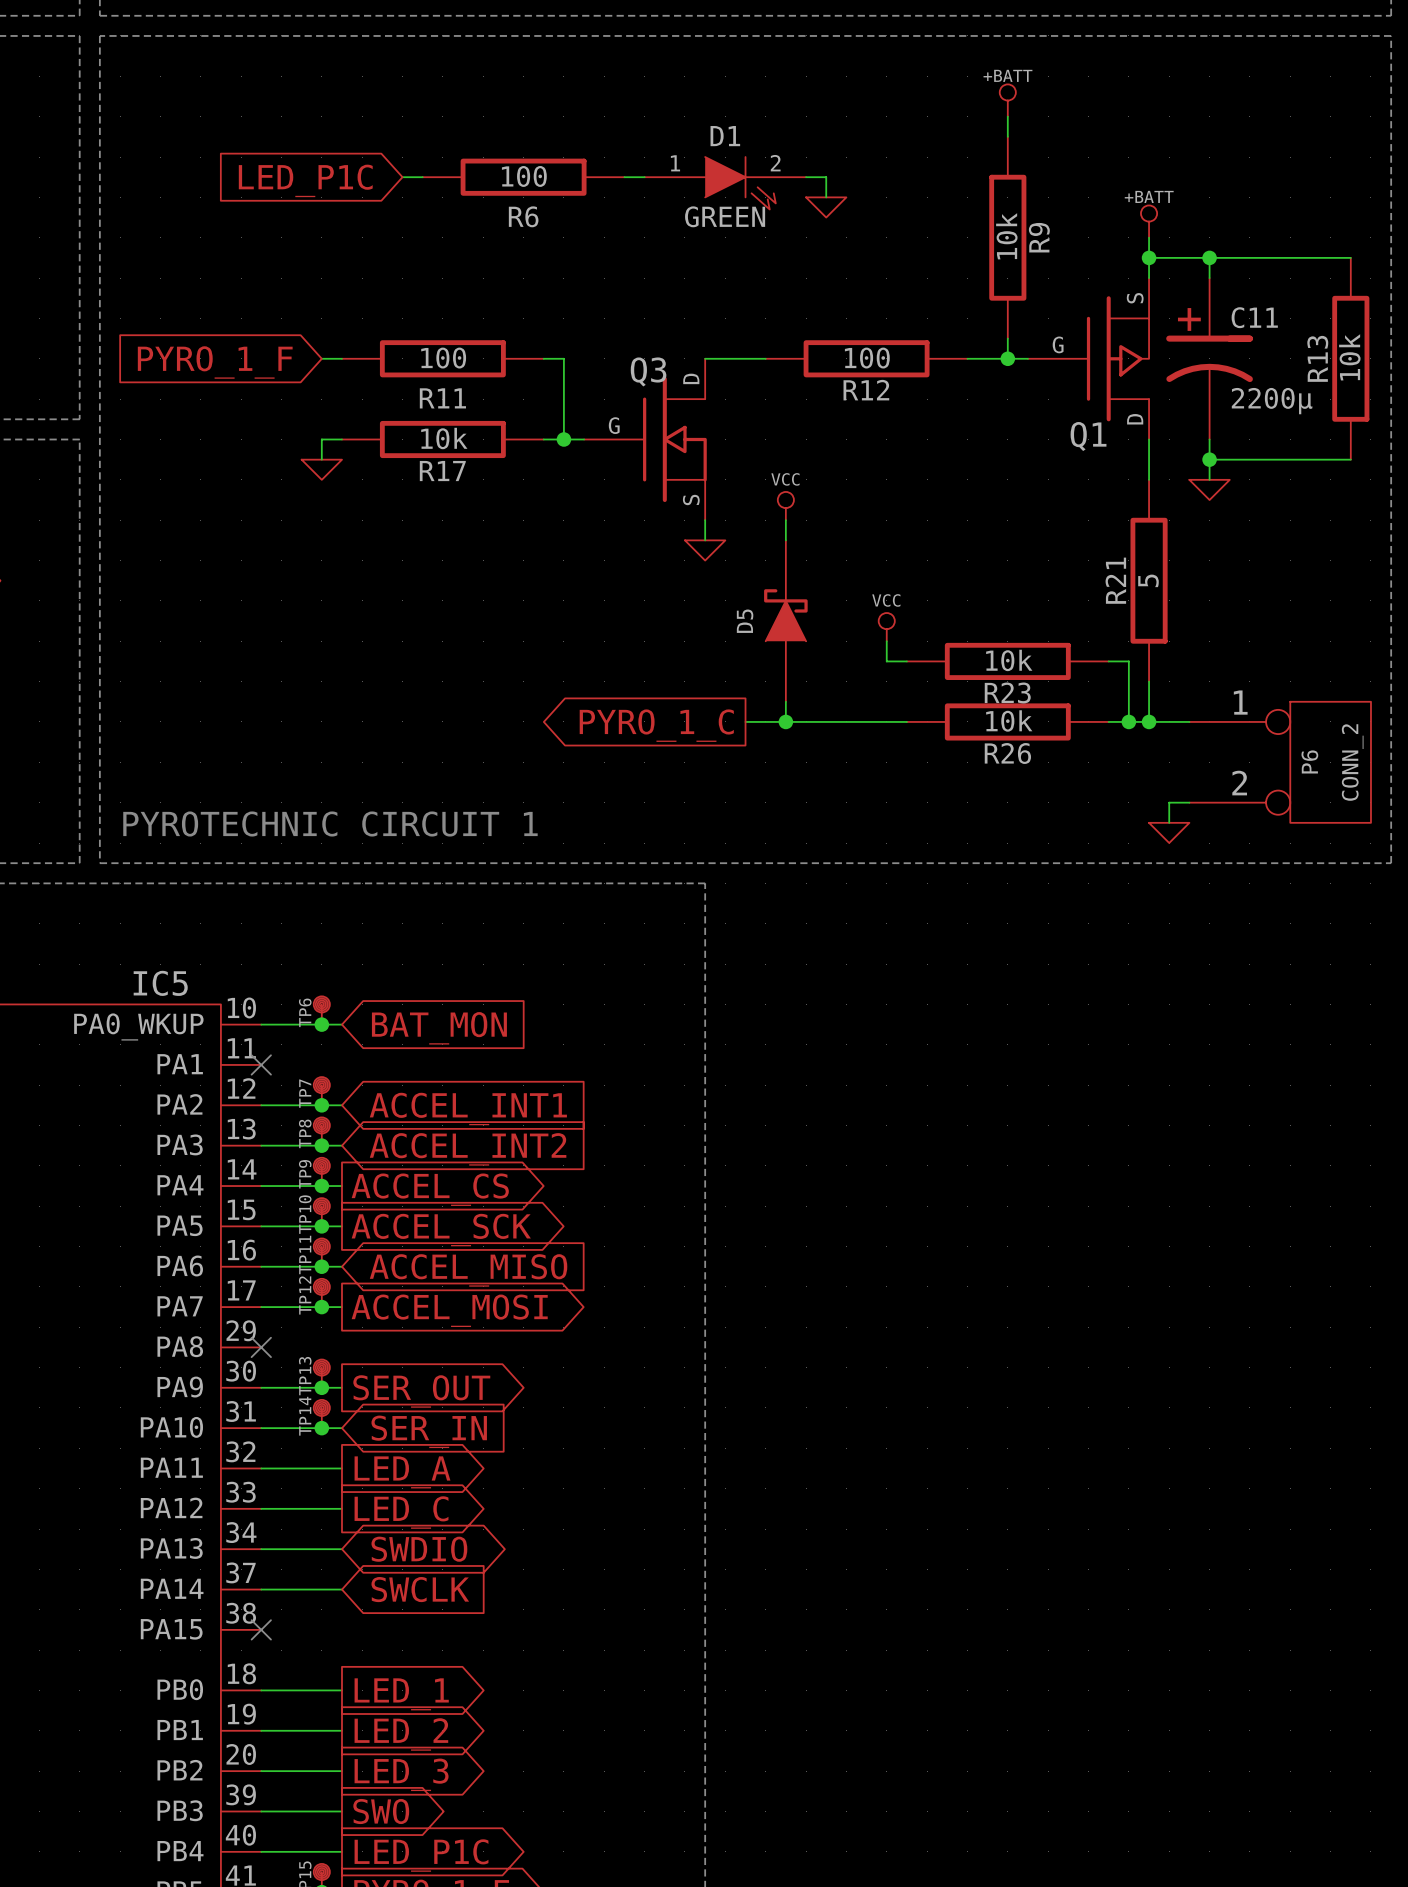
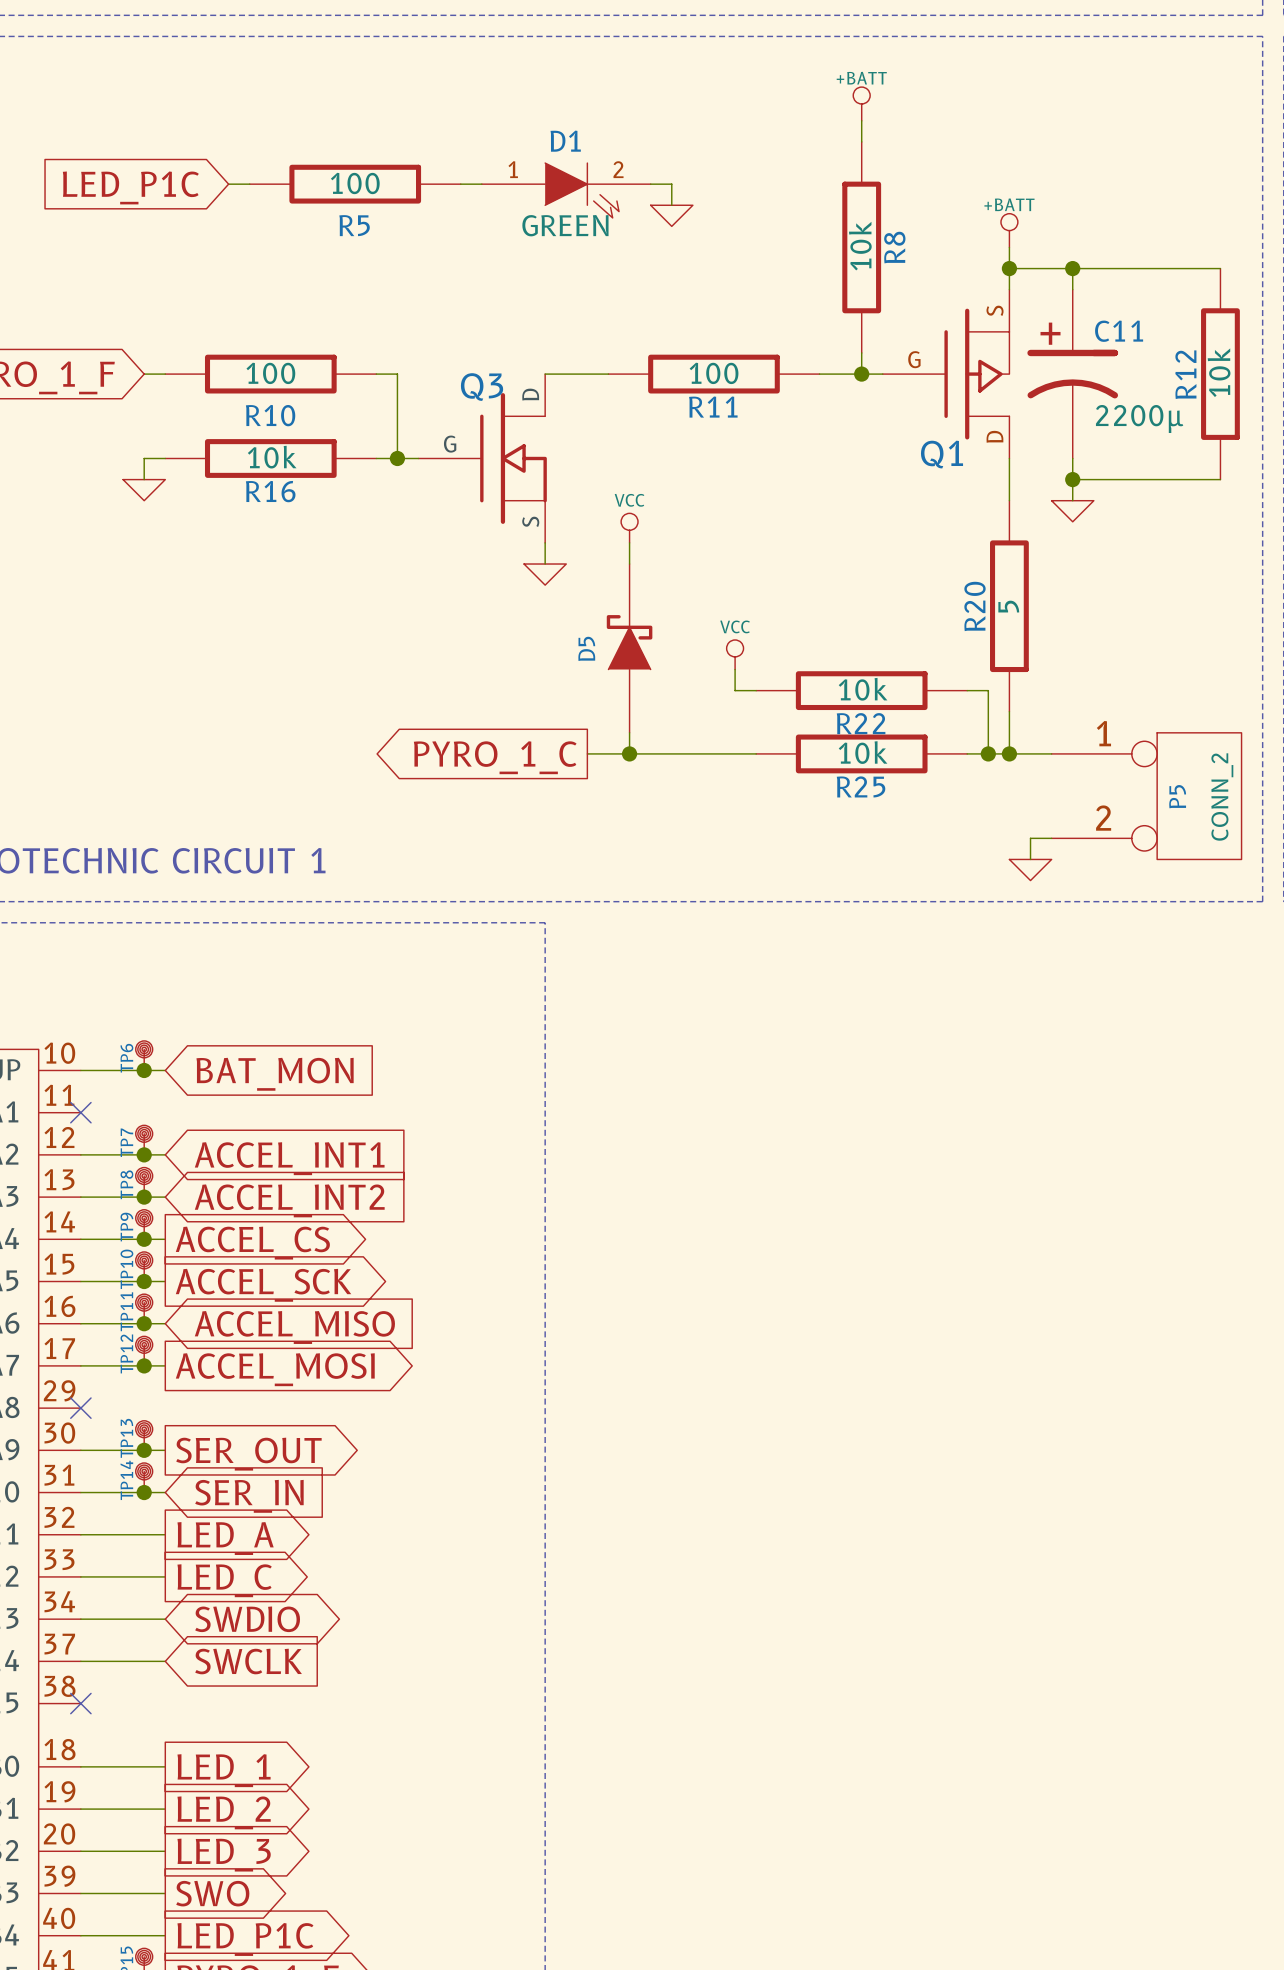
R6 name: R6 (523, 216) -> R5 (354, 225)
R9 name: R9 (1039, 237) -> R8 (894, 247)
R13 name: R13 (1317, 358) -> R12 (1185, 374)
R12 name: R12 (866, 390) -> R11 (713, 407)
R11 name: R11 (442, 398) -> R10 (270, 415)
R17 name: R17 (442, 471) -> R16 (270, 491)
R21 name: R21 (1115, 580) -> R20 (975, 606)
R23 name: R23 (1007, 692) -> R22 (861, 723)
R26 name: R26 (1007, 753) -> R25 (861, 786)
P6 name: P6 (1309, 761) -> P5 (1177, 796)

